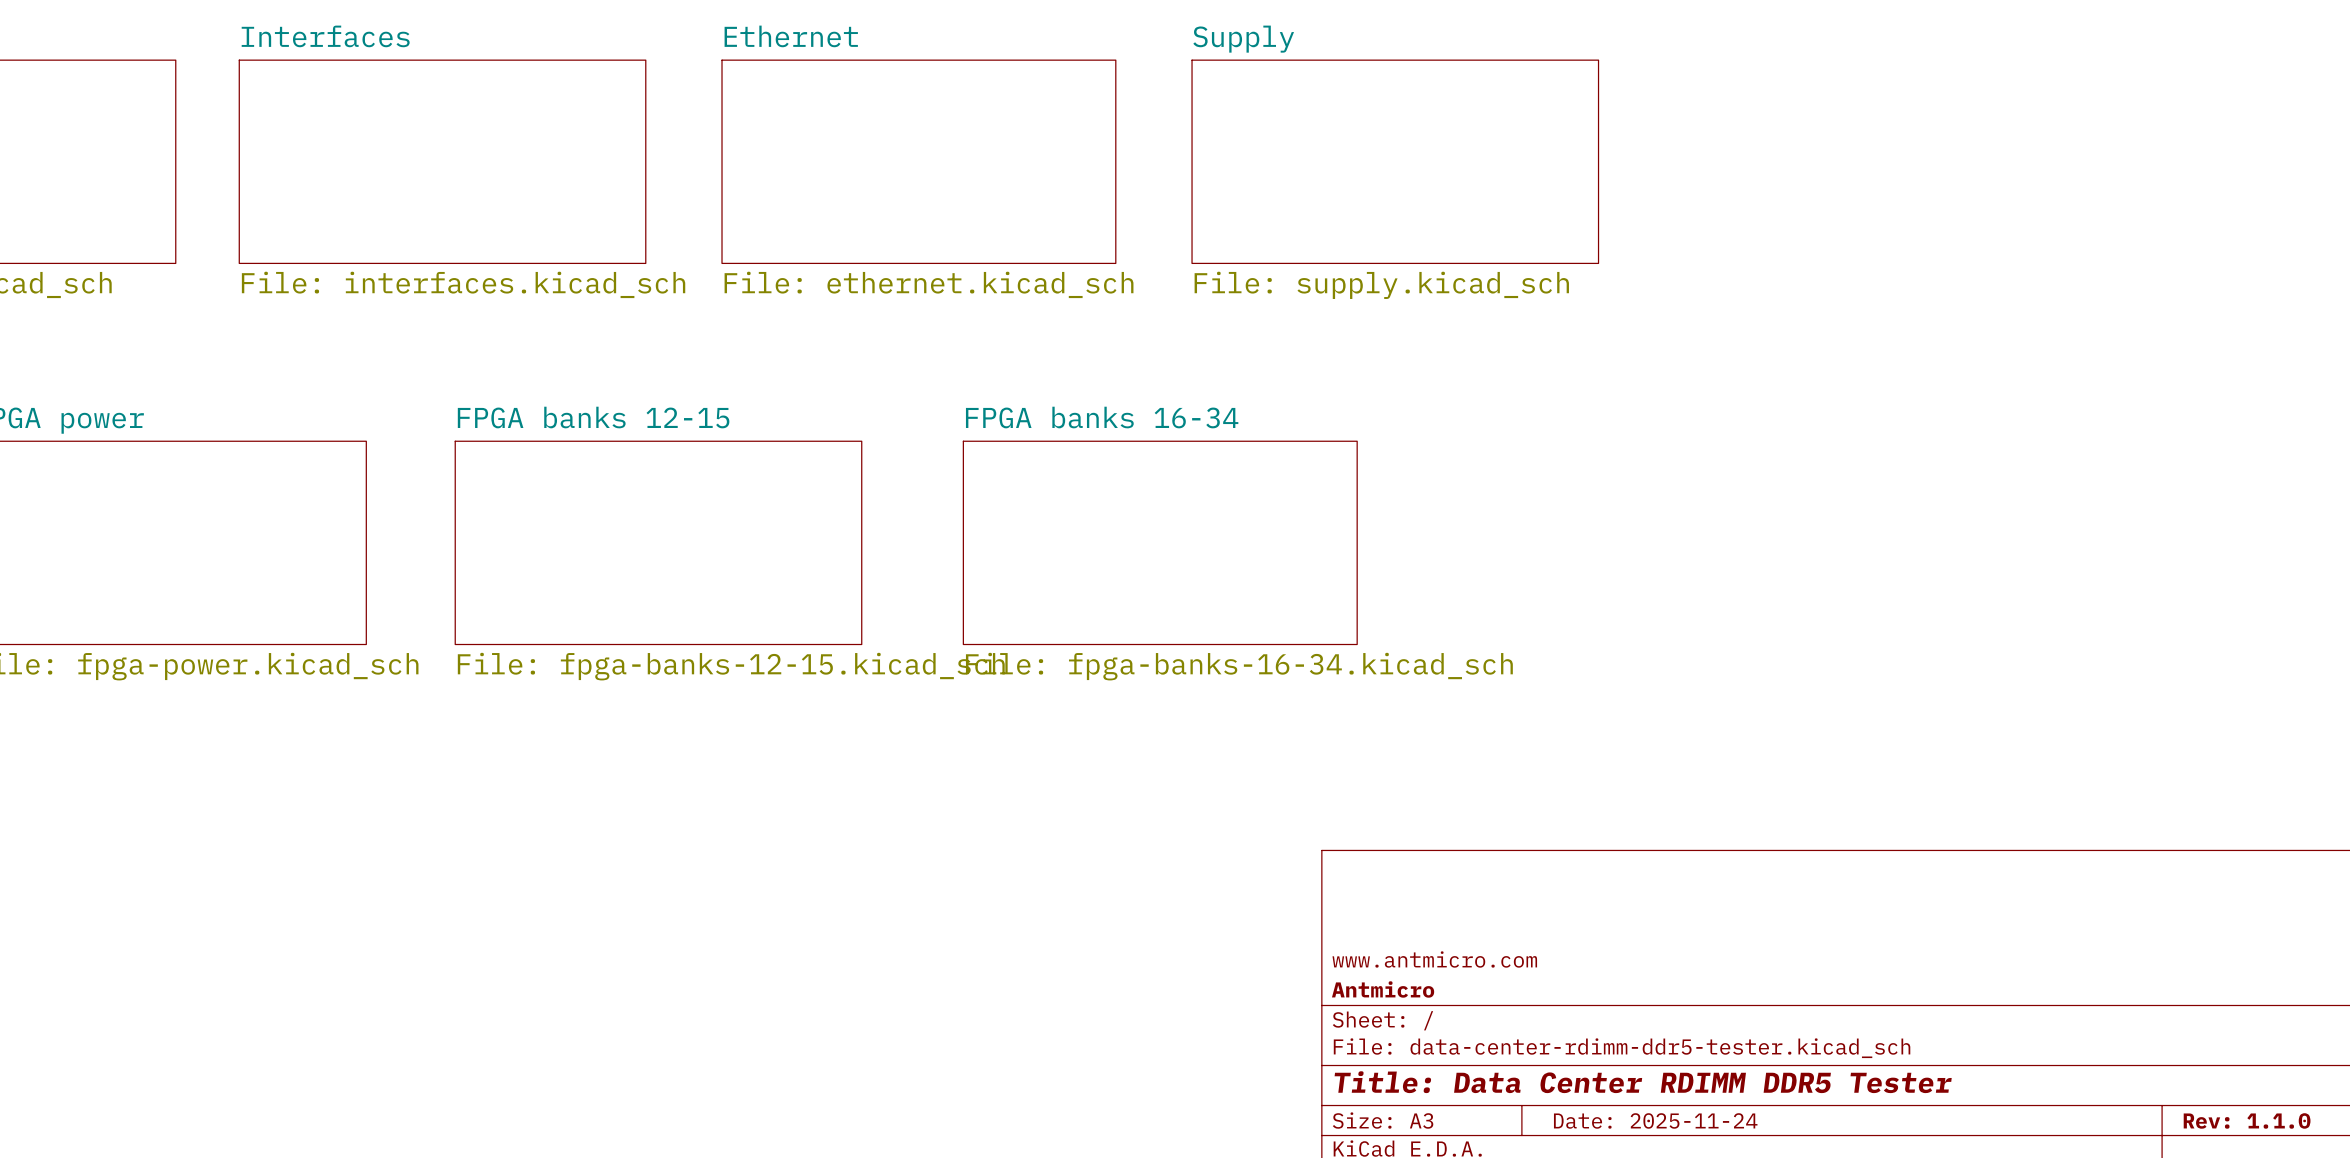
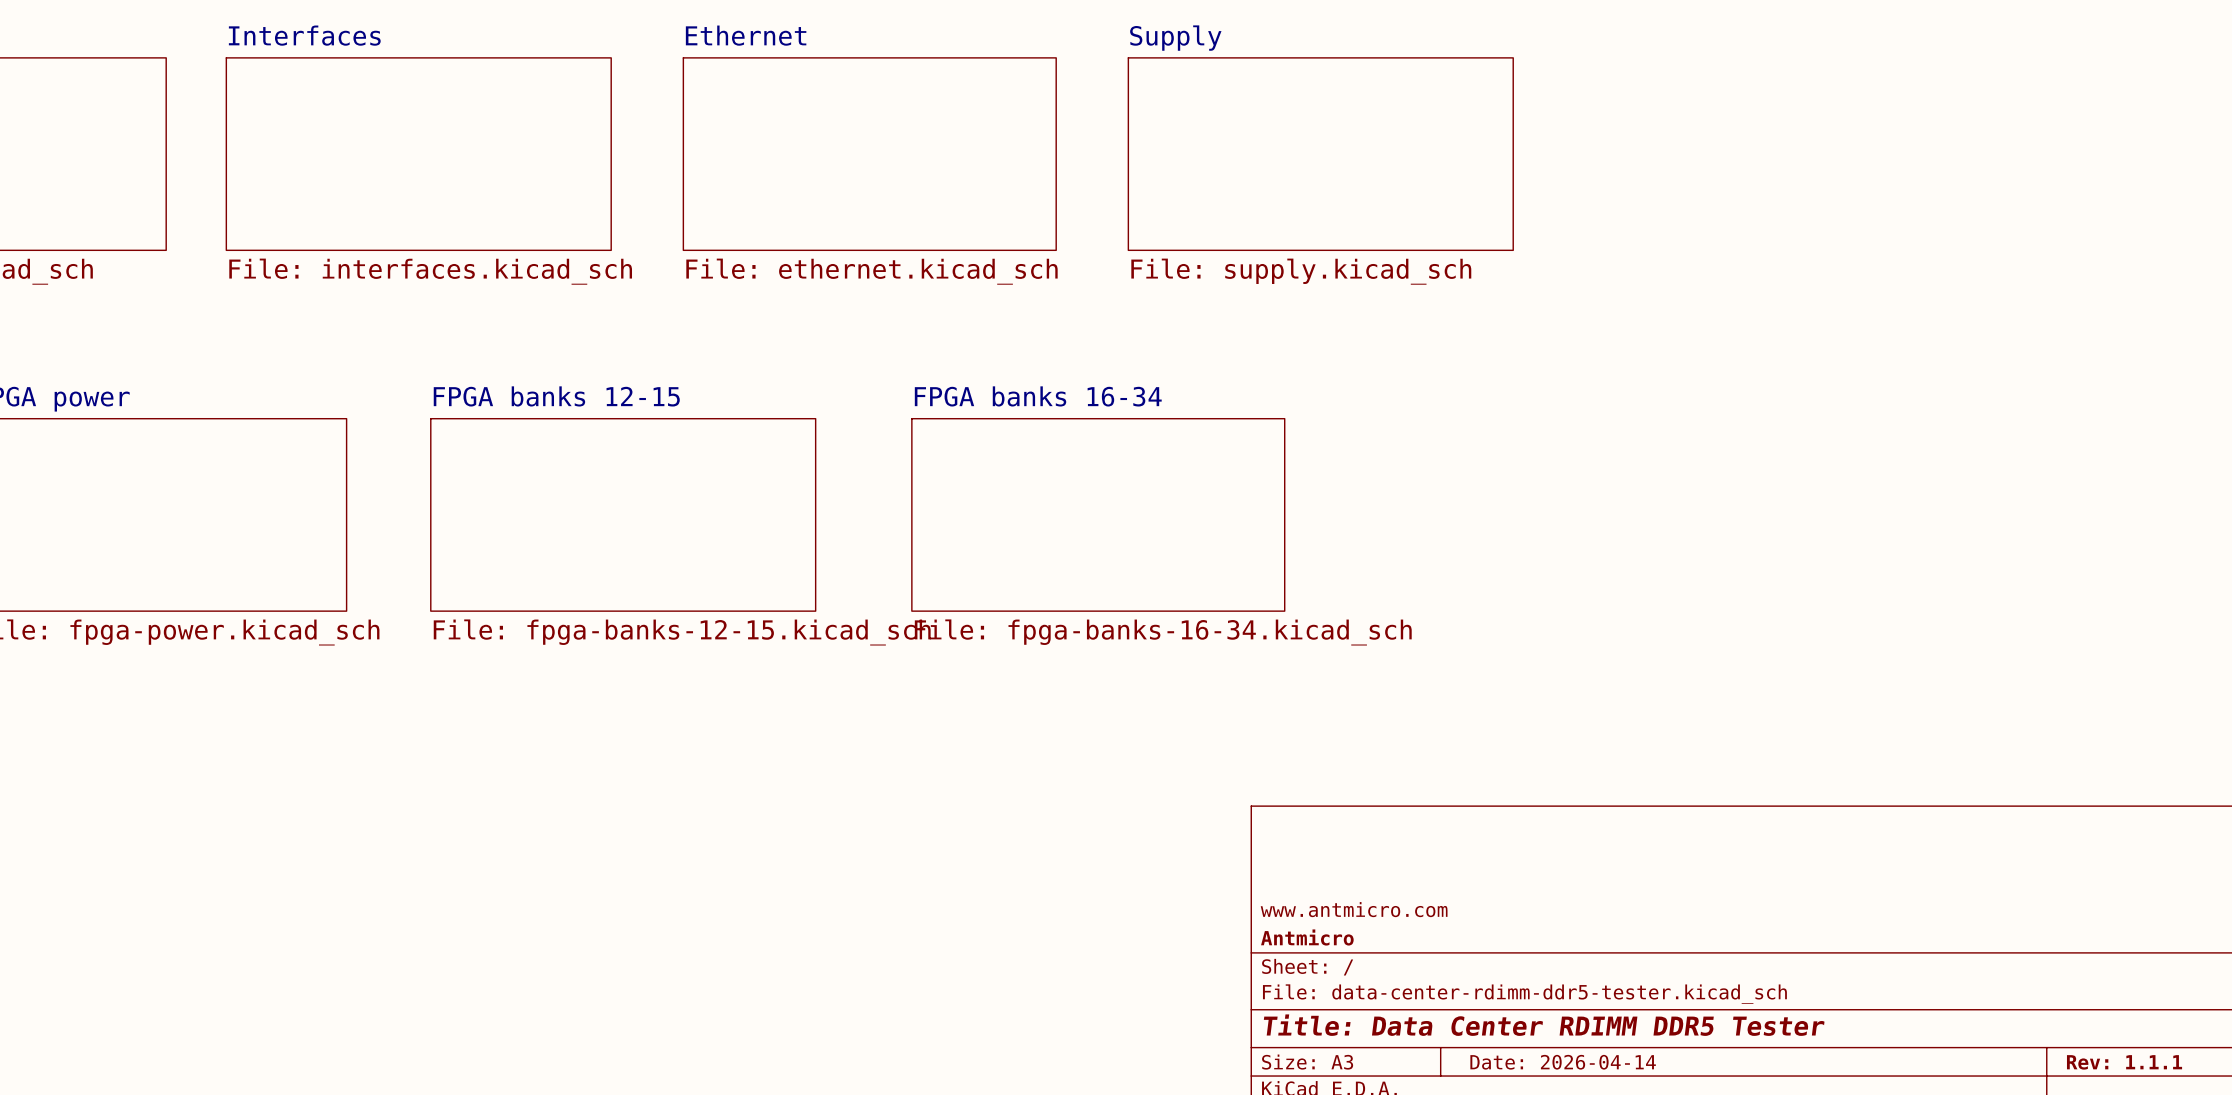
title block: Date: 2025-11-24 (1655, 1120) -> Date: 2026-04-14 (1563, 1062)
title block: Rev: 1.1.0 (2247, 1120) -> Rev: 1.1.1 (2124, 1062)

